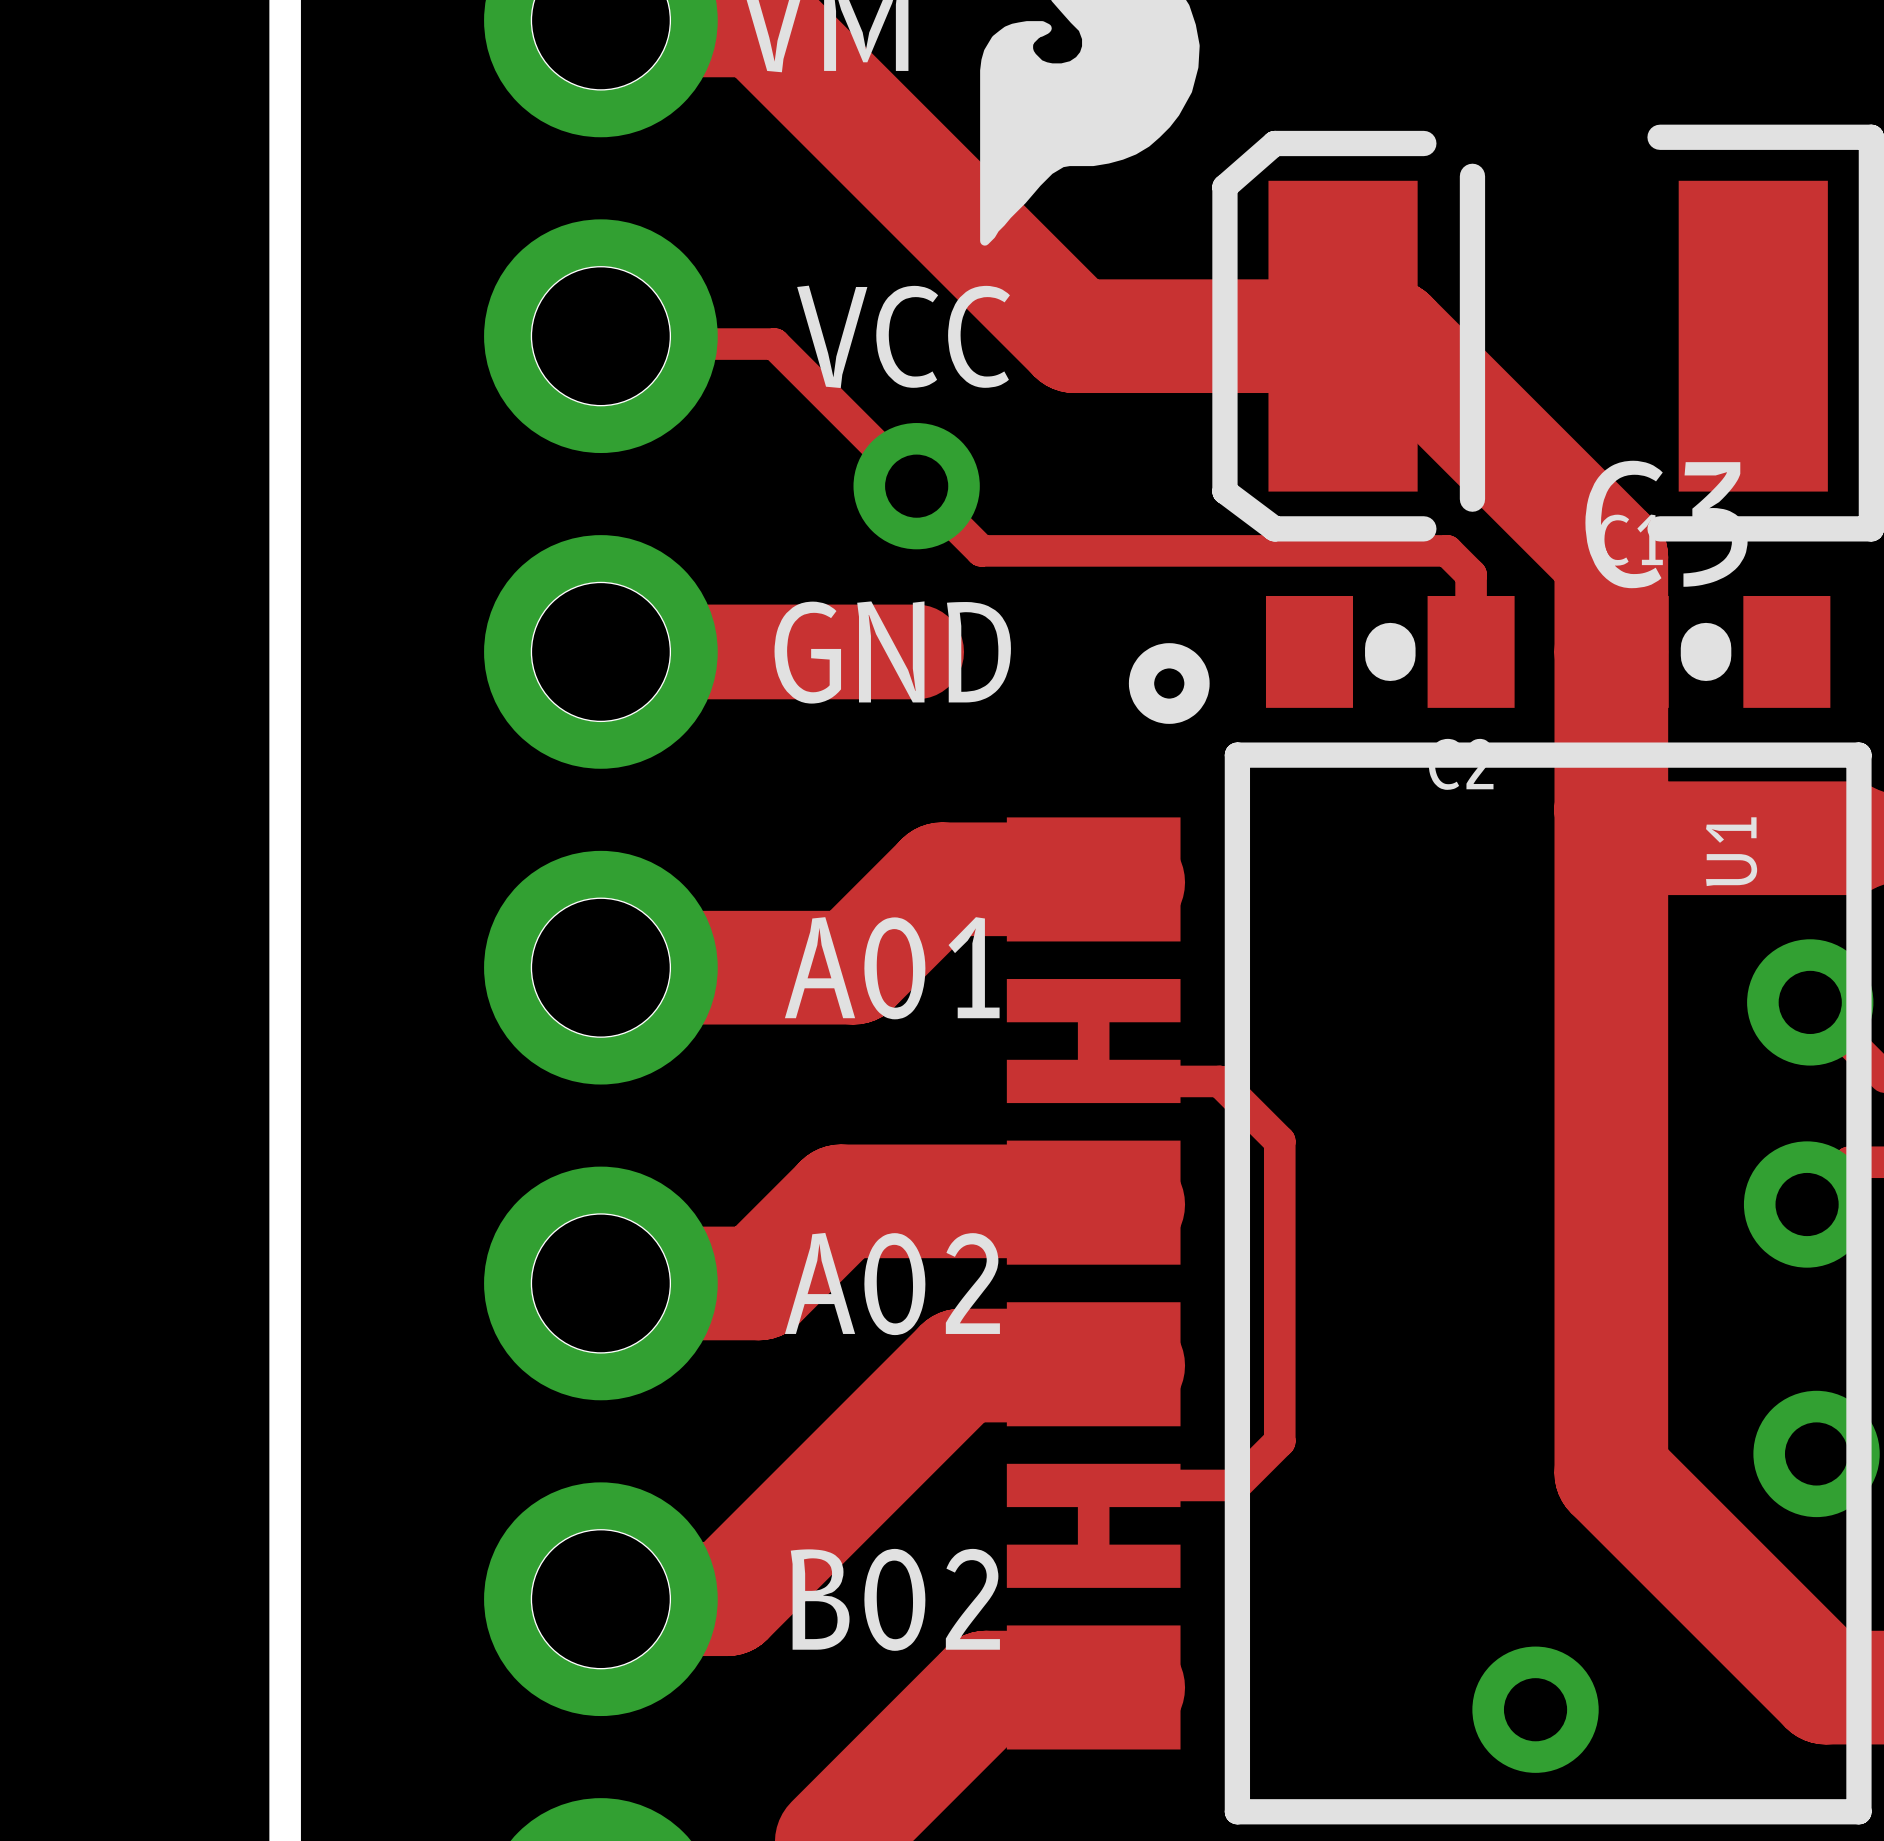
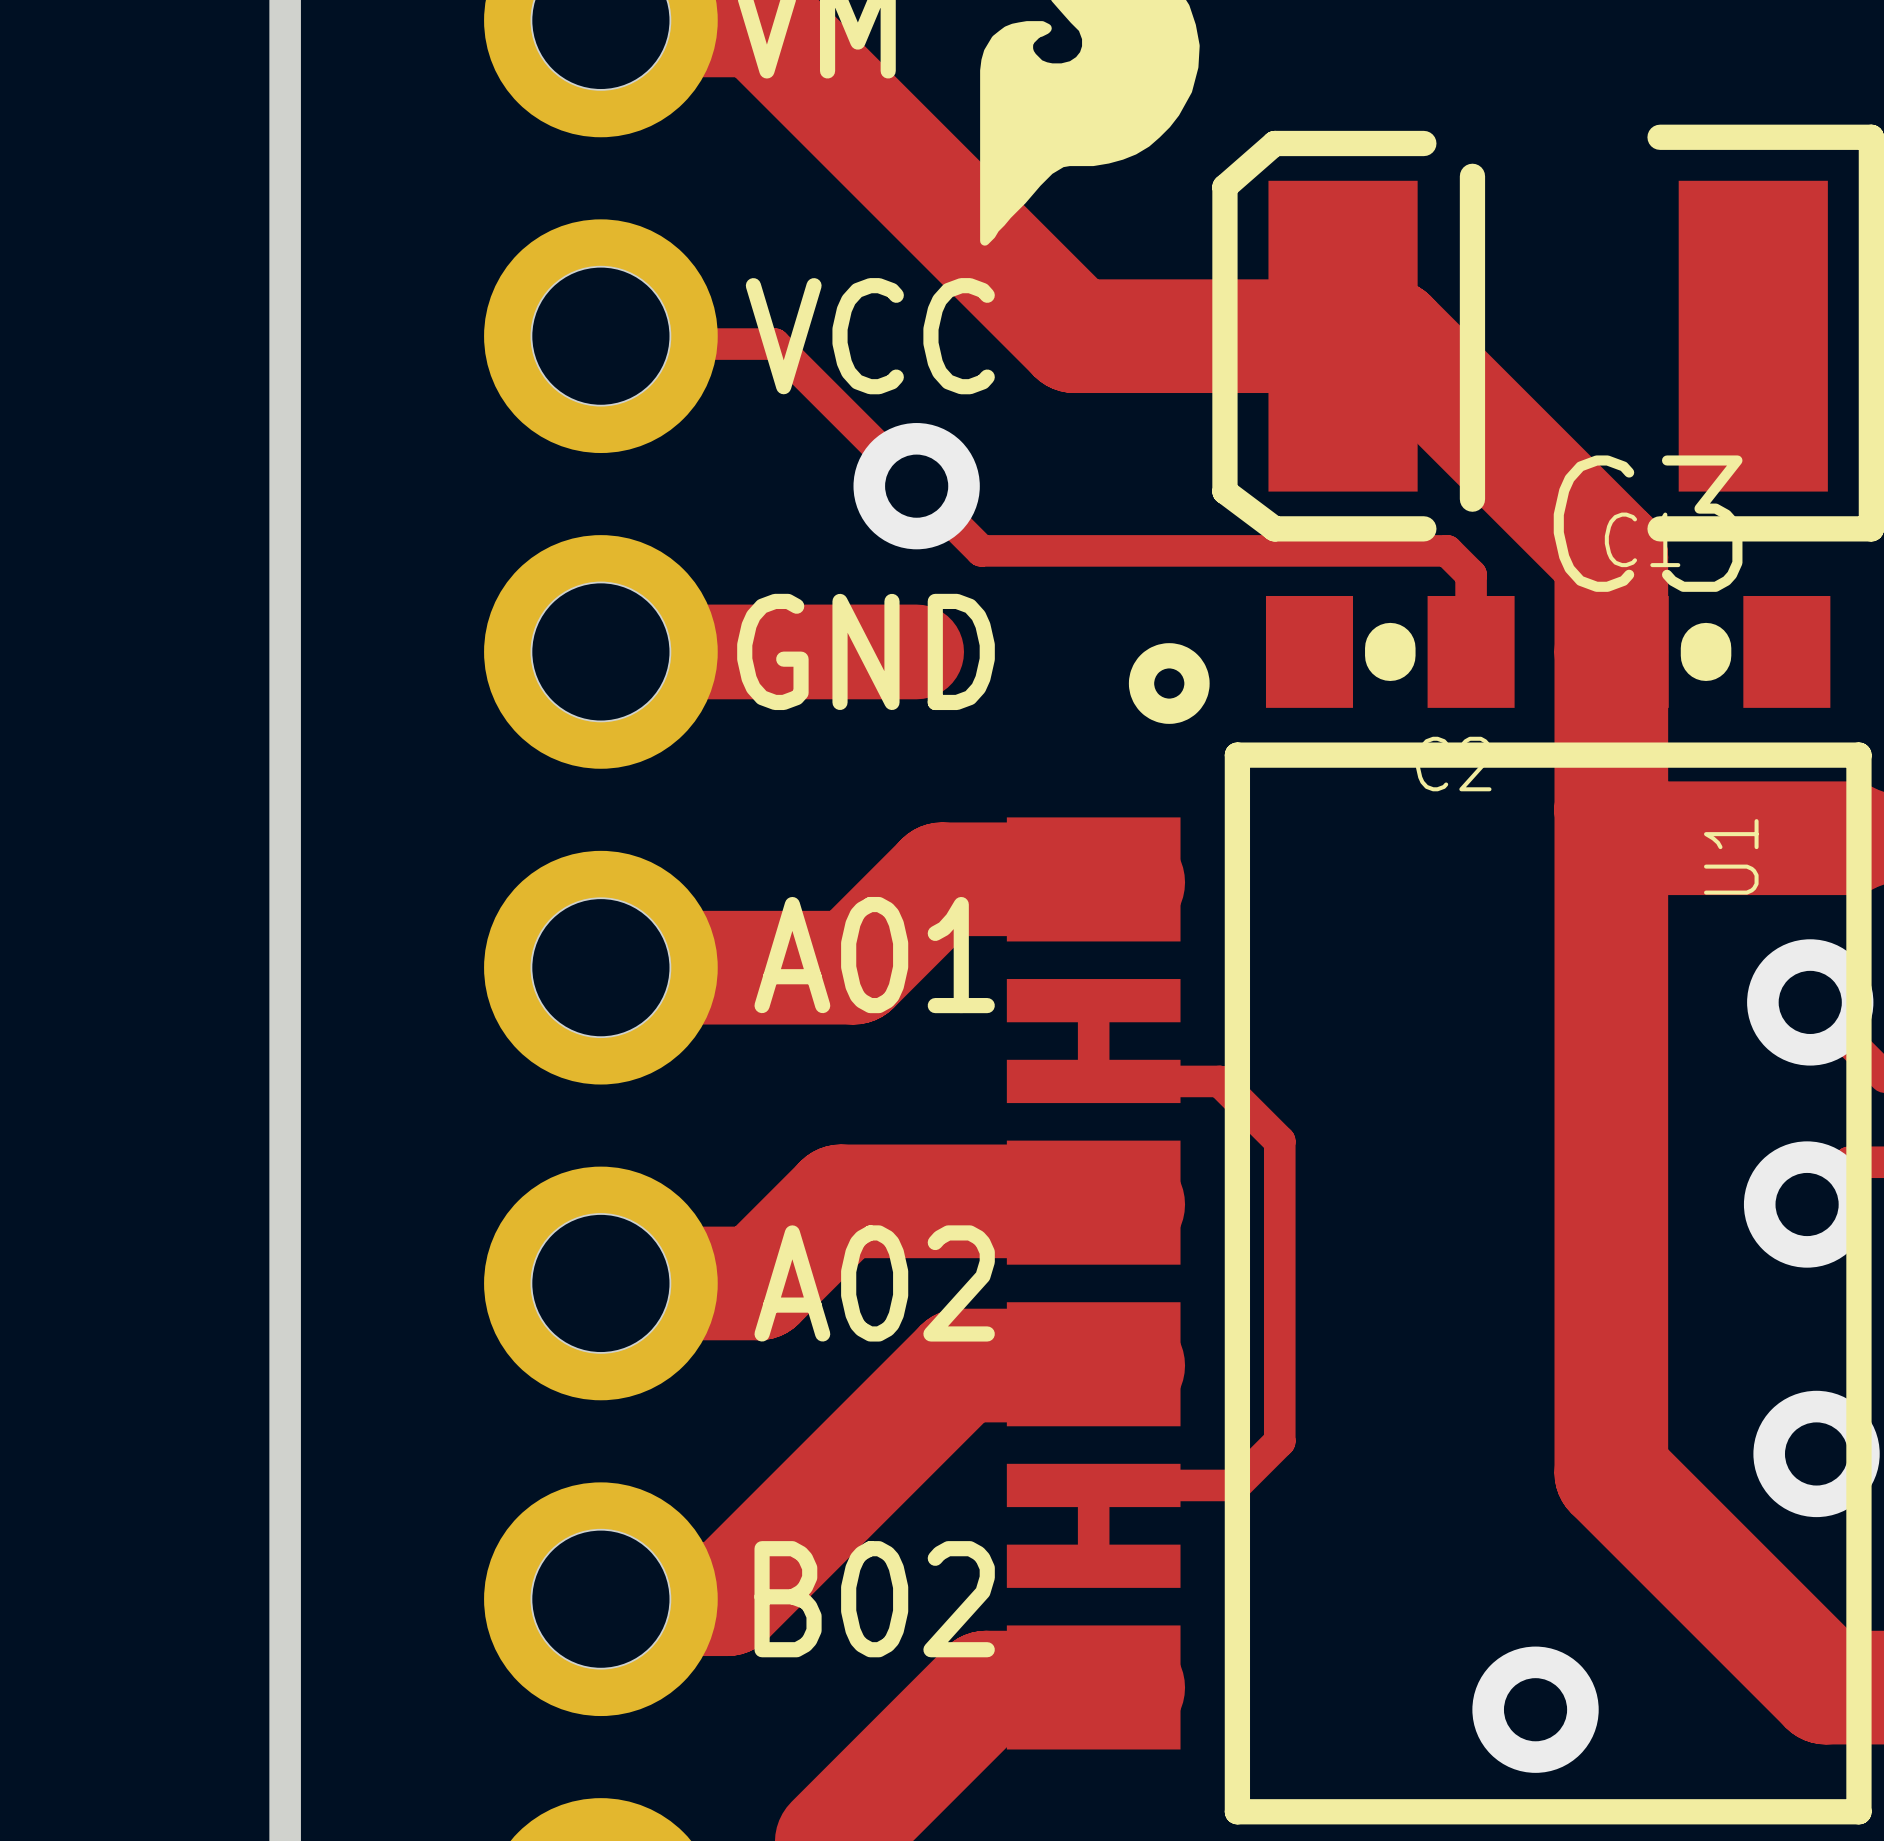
text position: A01 (892, 968) -> A01 (874, 955)

